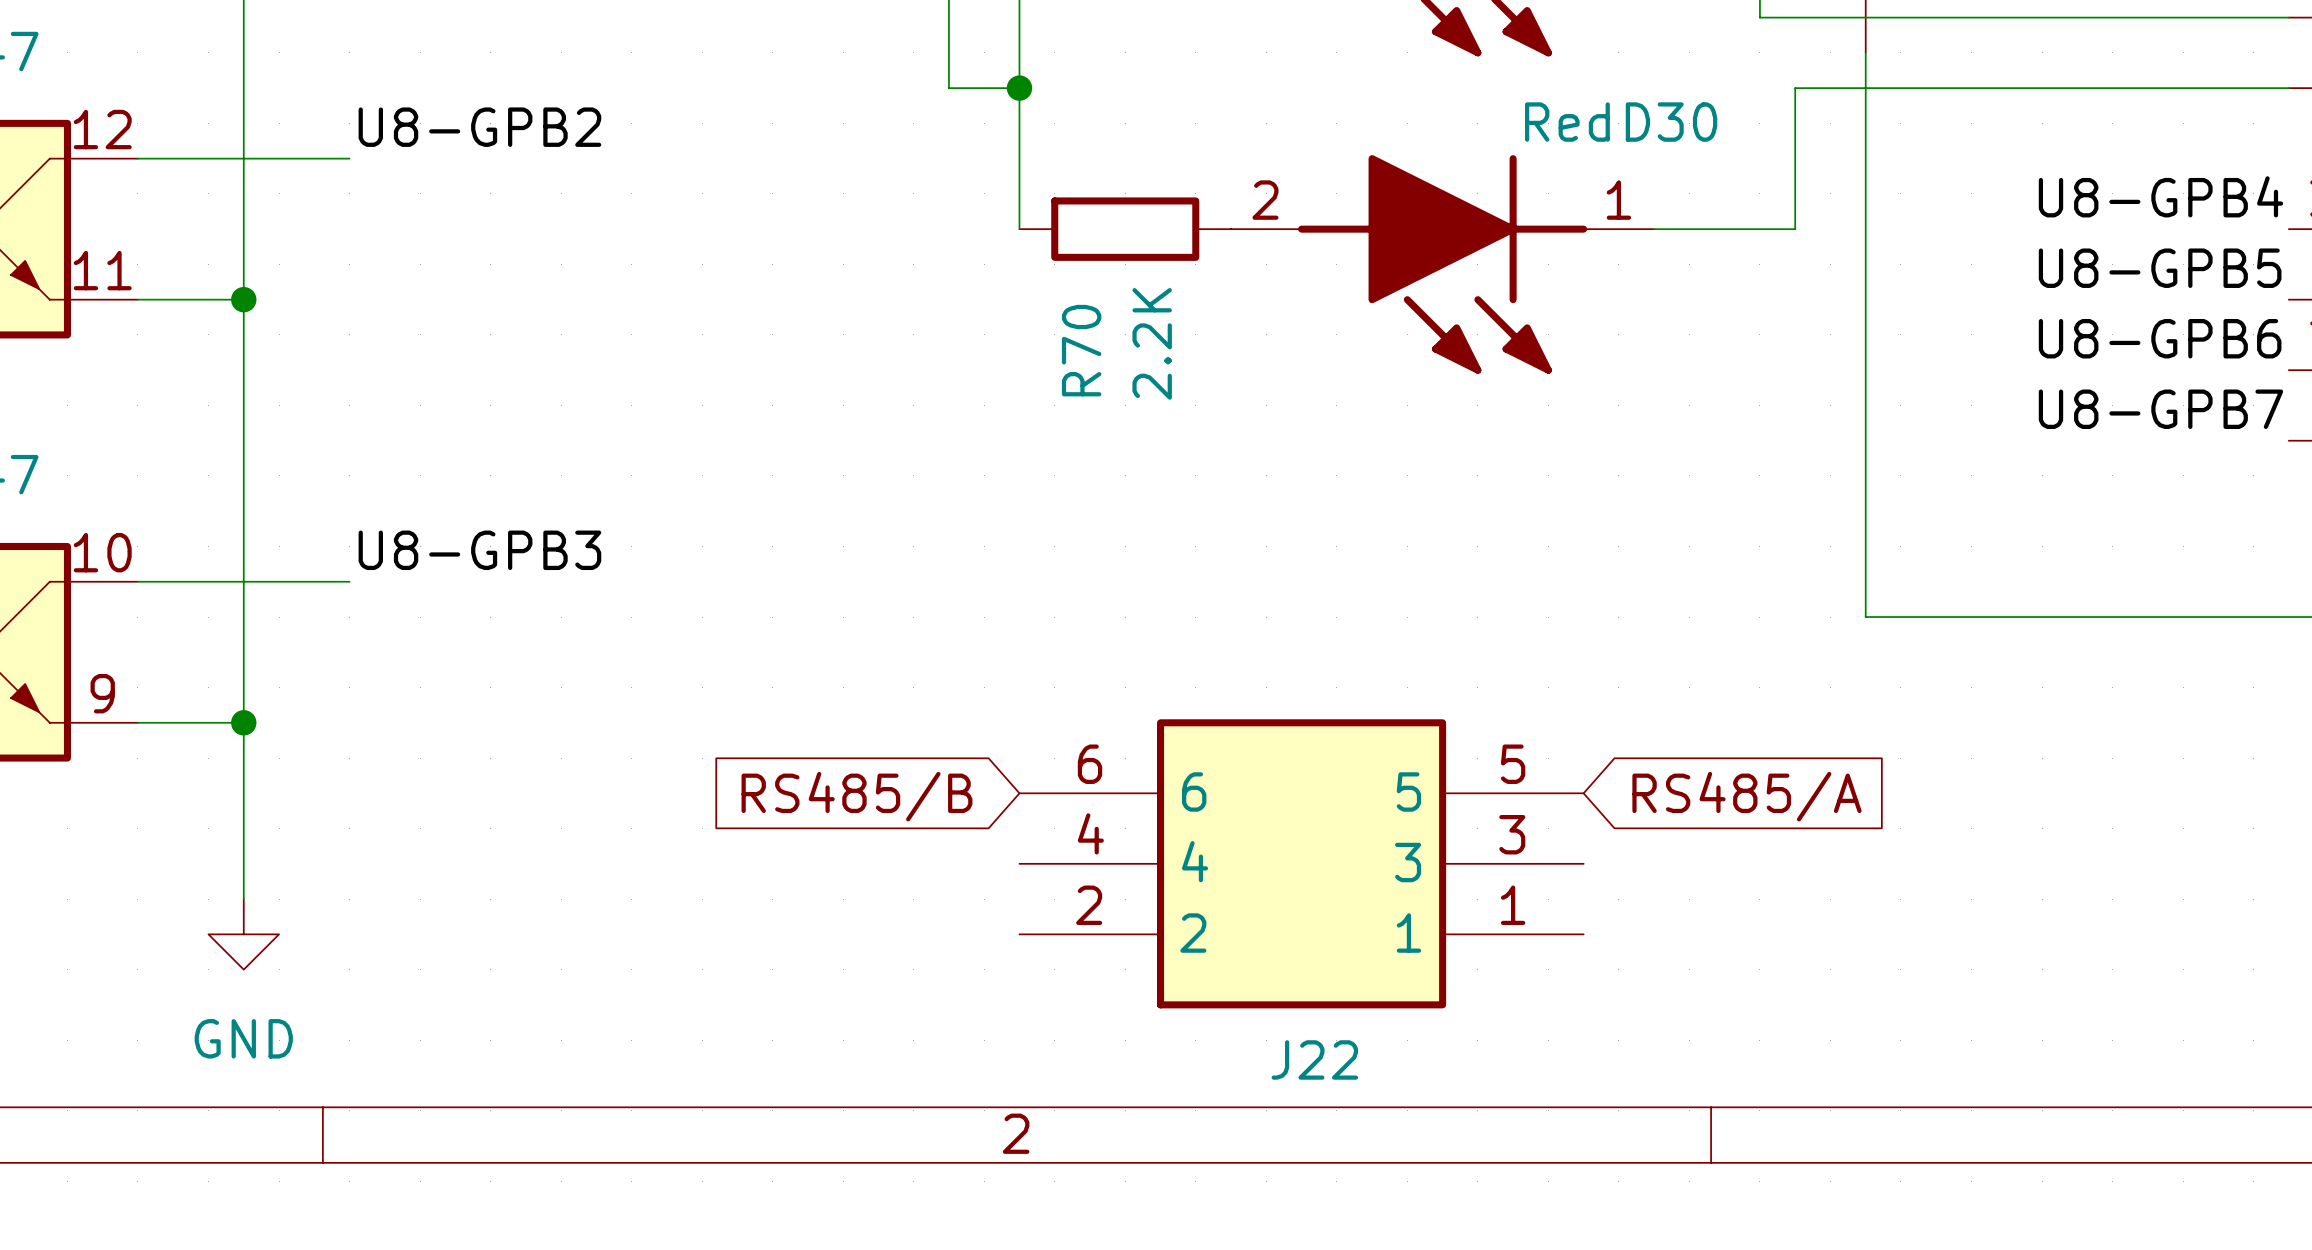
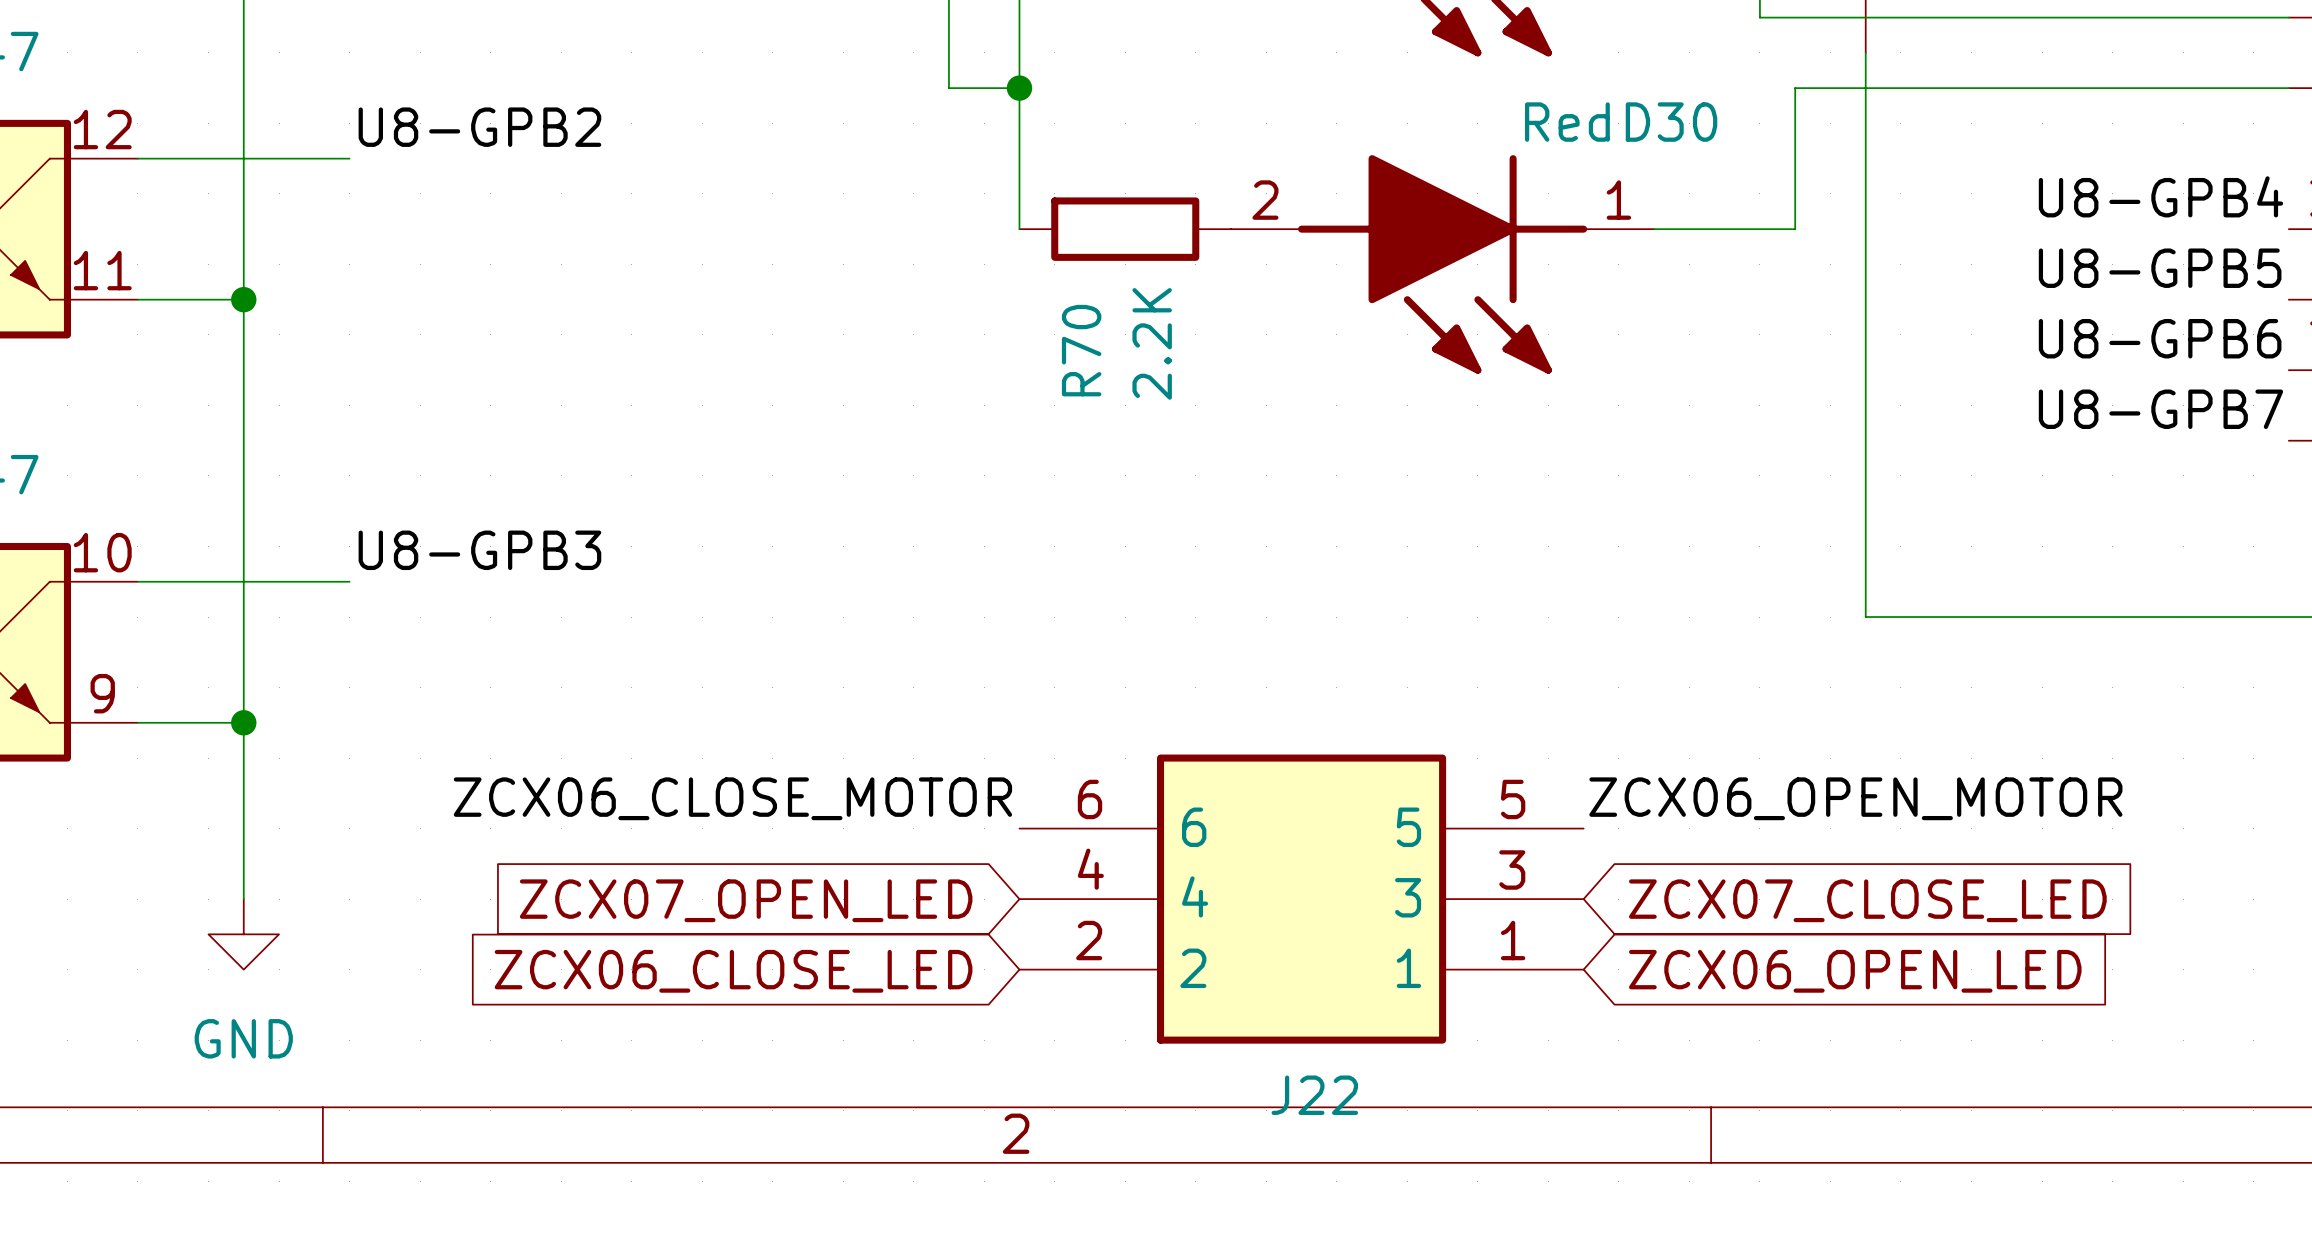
global label: RS485/B (856, 796) -> none
global label: RS485/A (1746, 796) -> none
label: none -> ZCX06_CLOSE_MOTOR (732, 798)
label: none -> ZCX06_OPEN_MOTOR (1855, 798)
J22 position: (1301, 863) -> (1301, 899)
global label: none -> ZCX07_OPEN_LED (746, 900)
global label: none -> ZCX07_CLOSE_LED (1867, 900)
global label: none -> ZCX06_CLOSE_LED (733, 971)
global label: none -> ZCX06_OPEN_LED (1855, 971)

